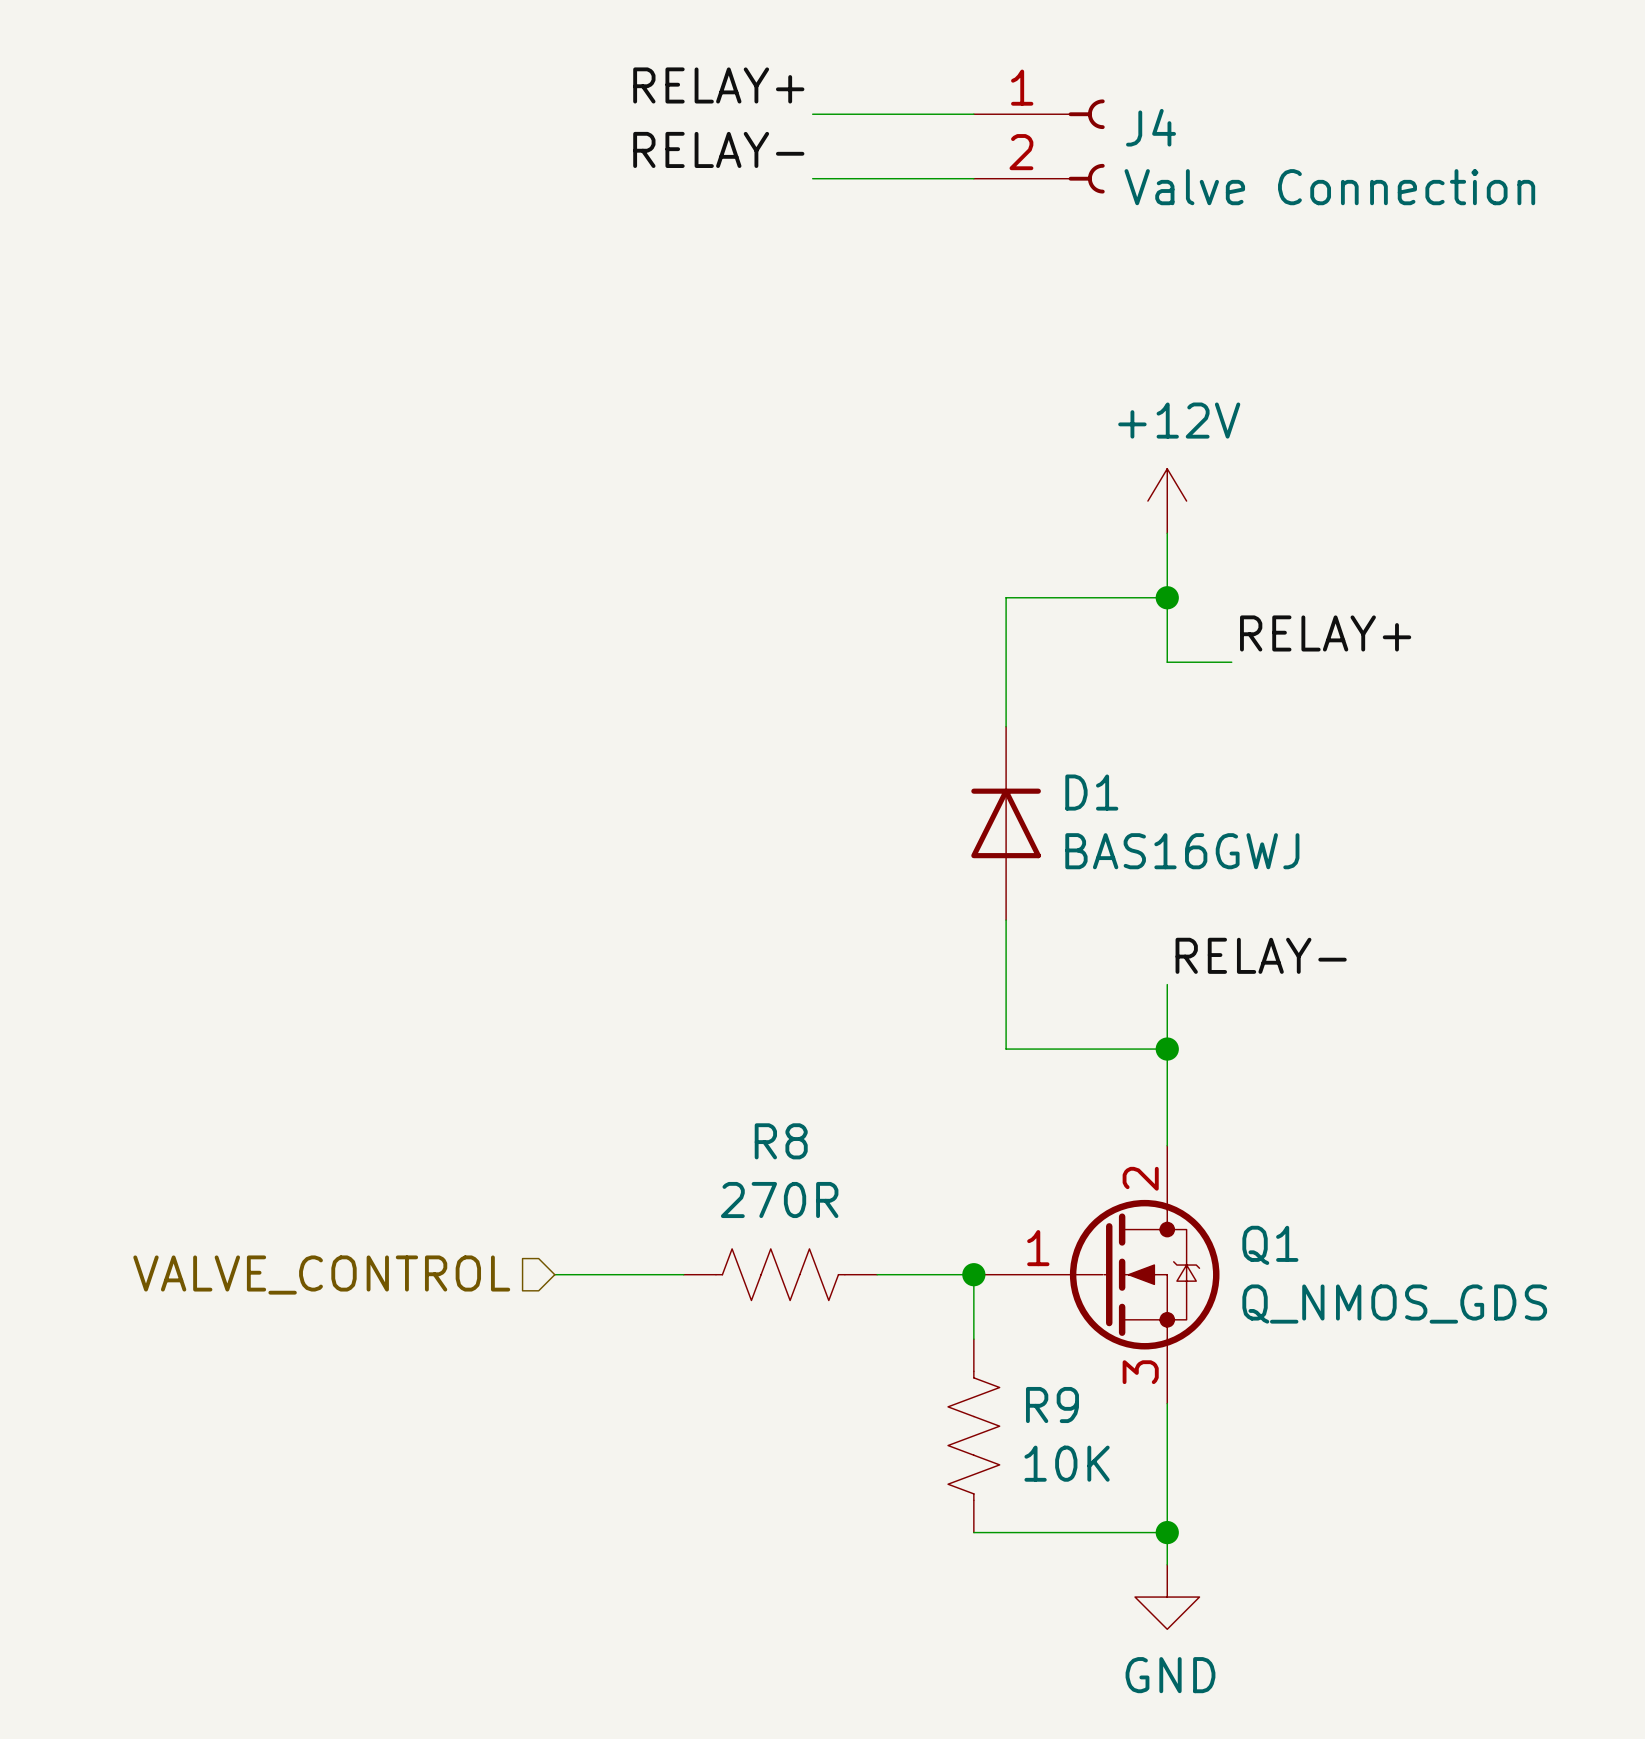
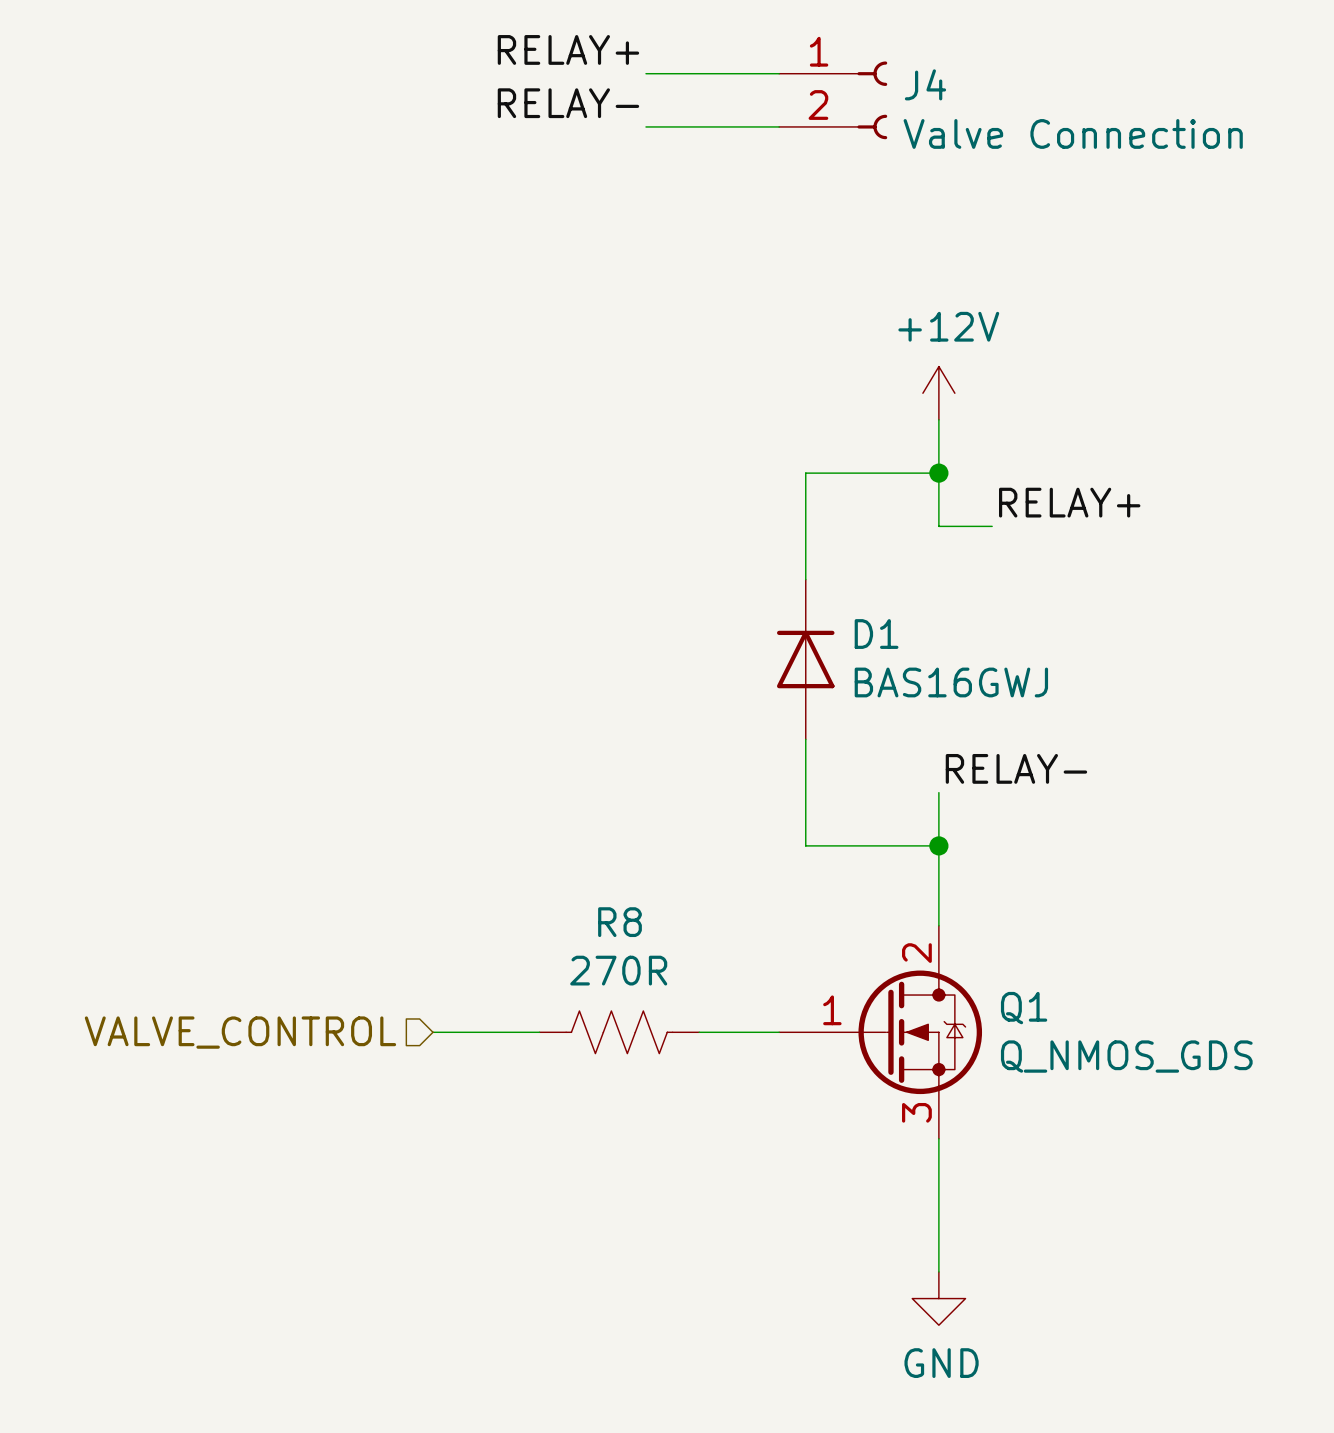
wire: (973, 1274) (973, 1339) -> none
junction: (973, 1274) -> none
R9: 10K (973, 1435) -> none
wire: (973, 1532) (1167, 1532) -> none
junction: (1167, 1532) -> none

